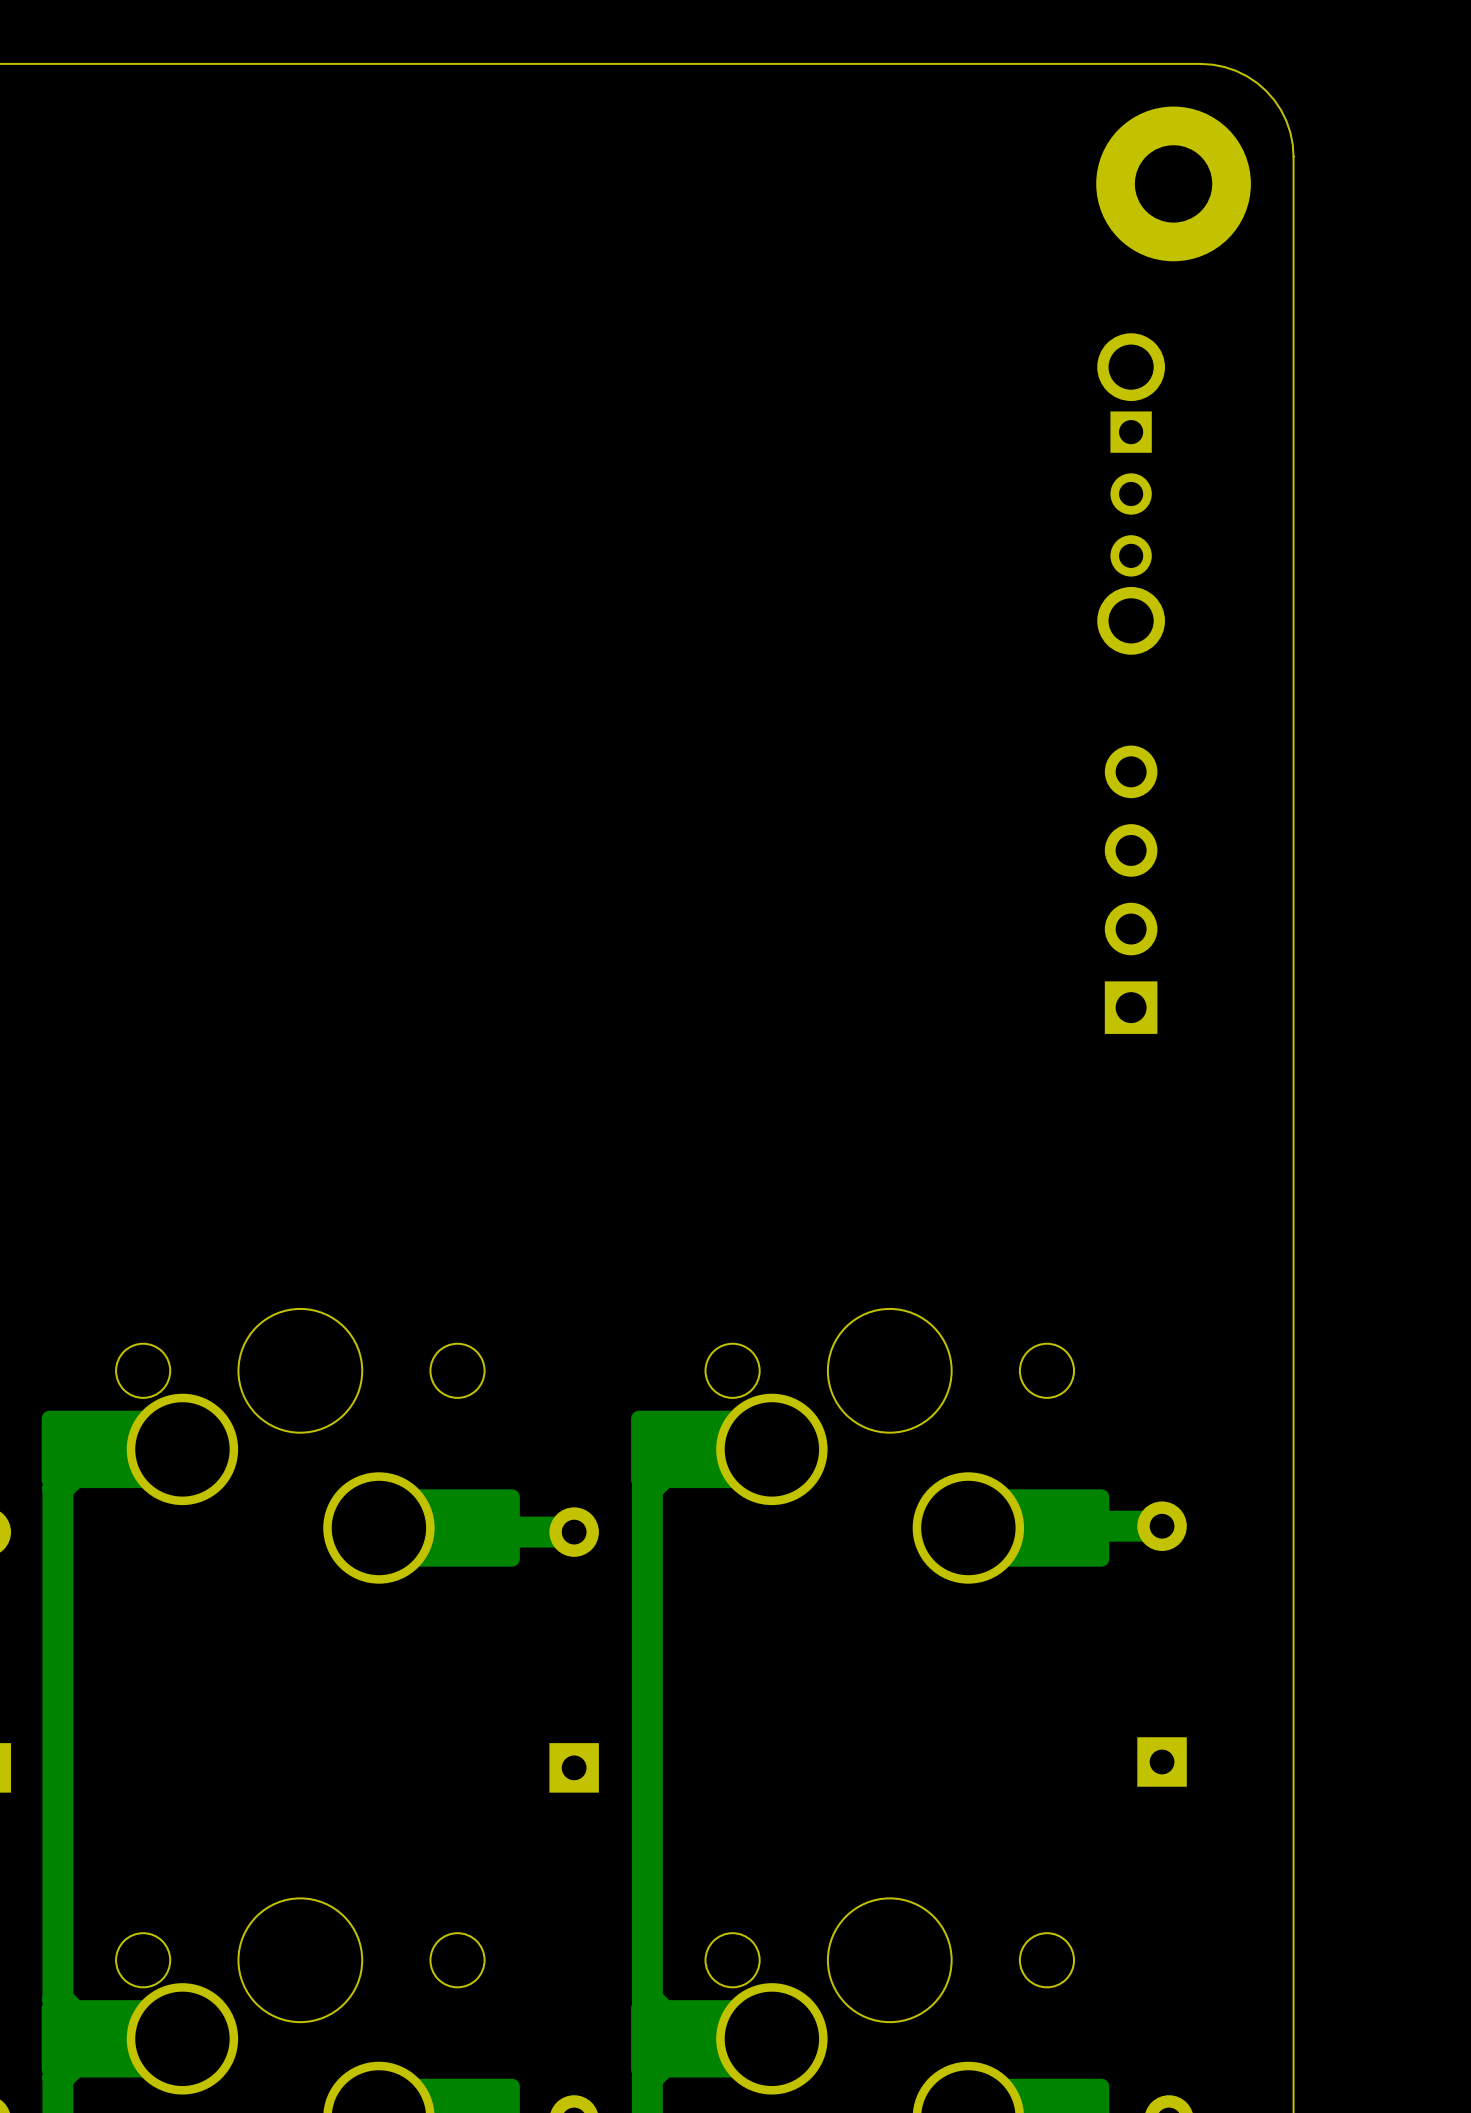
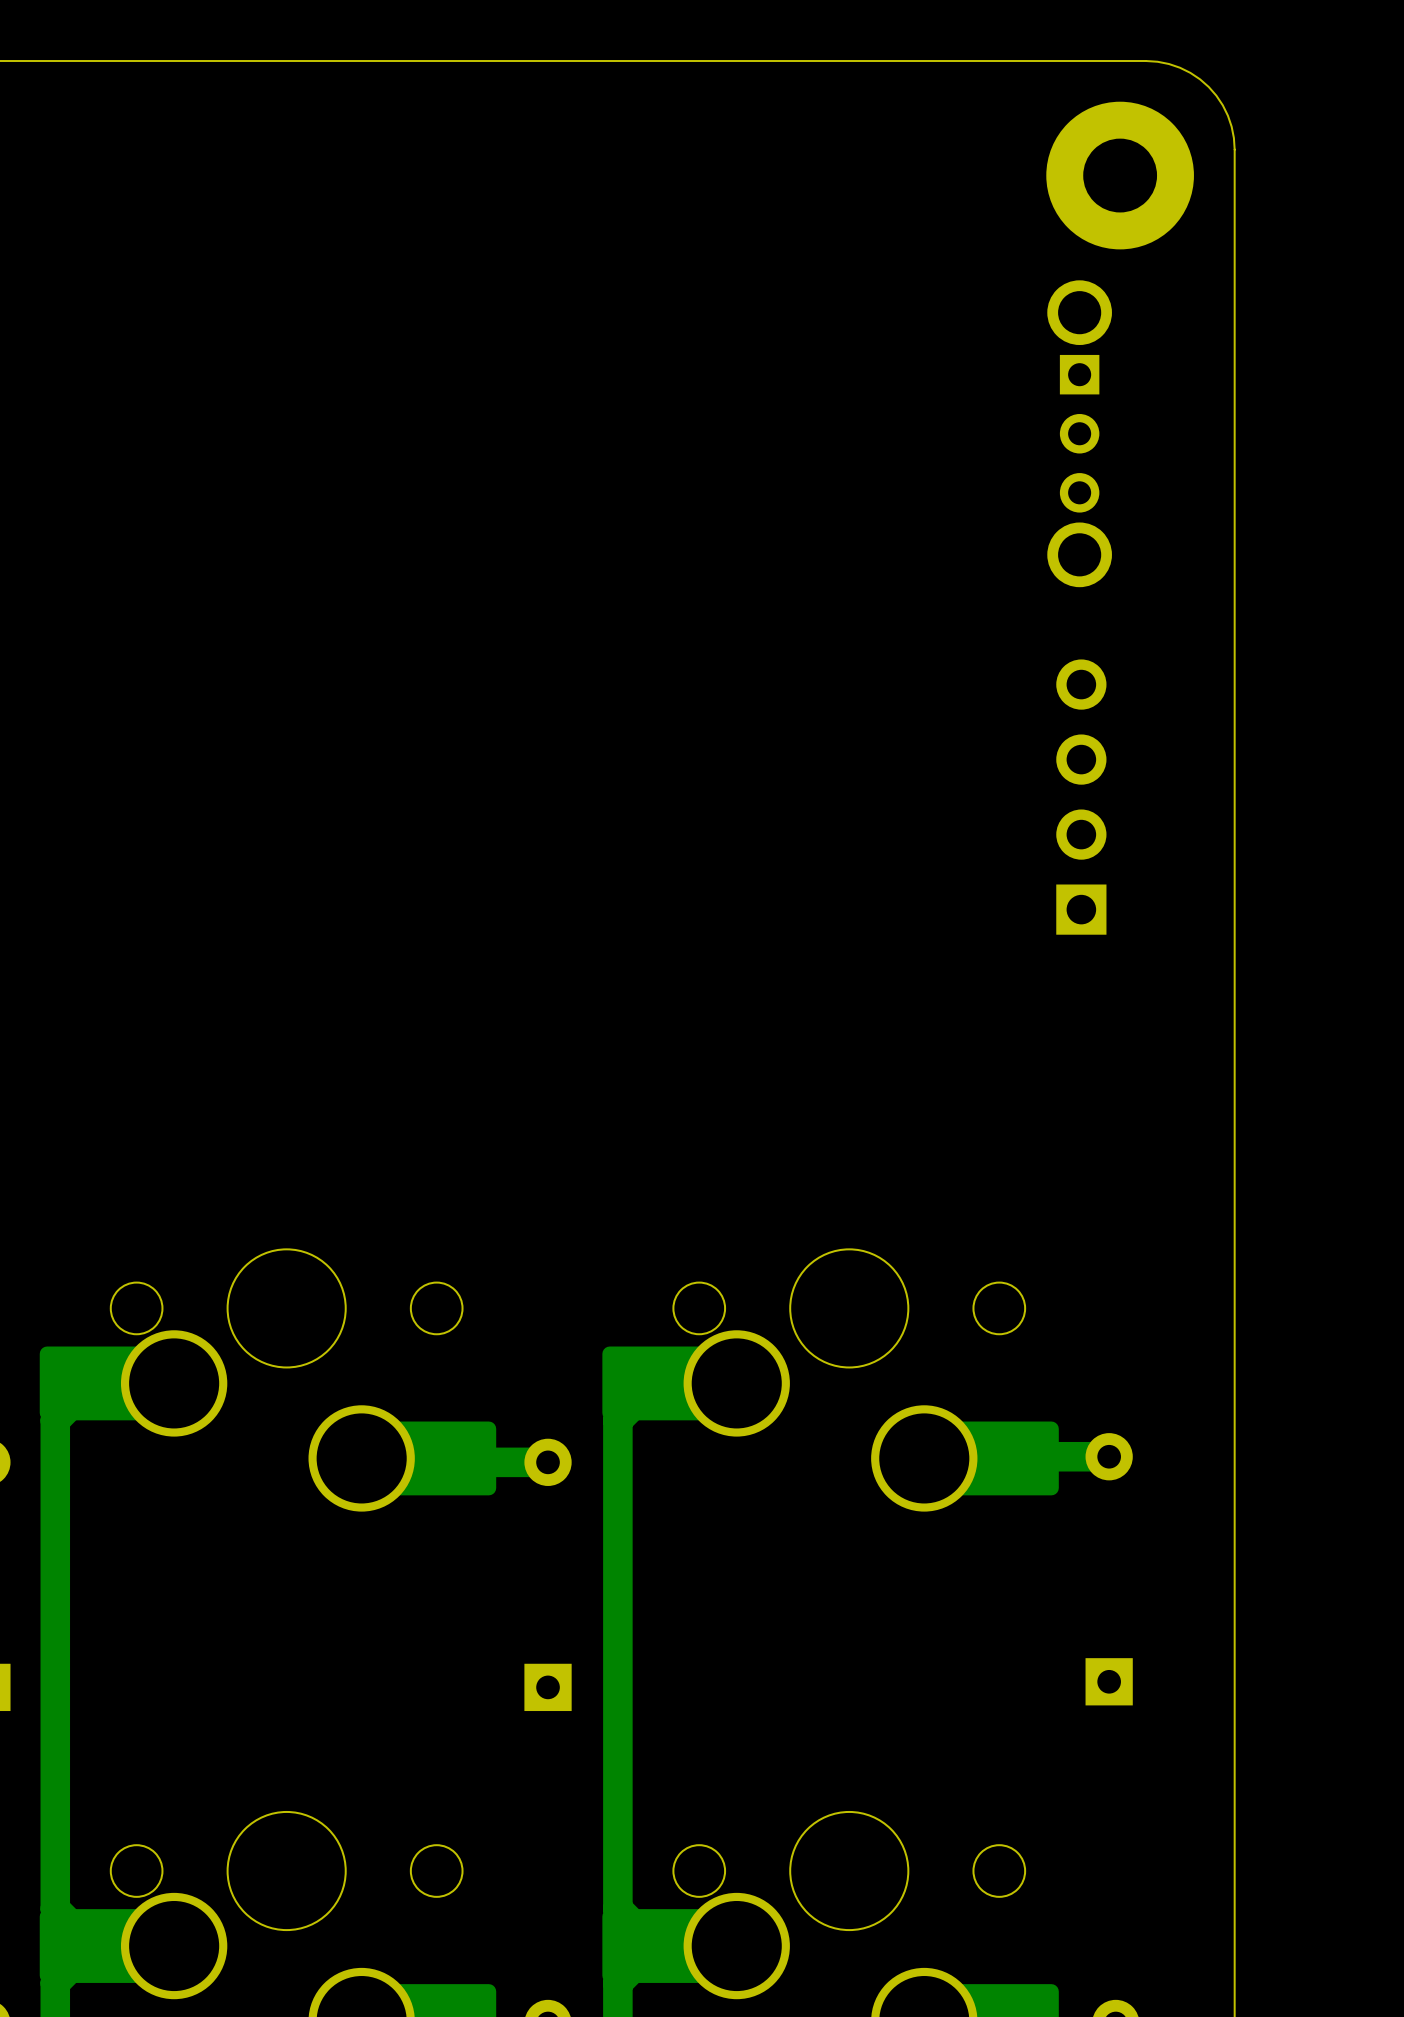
part position: (1131, 494) -> (1079, 433)
part position: (1131, 889) -> (1081, 797)

